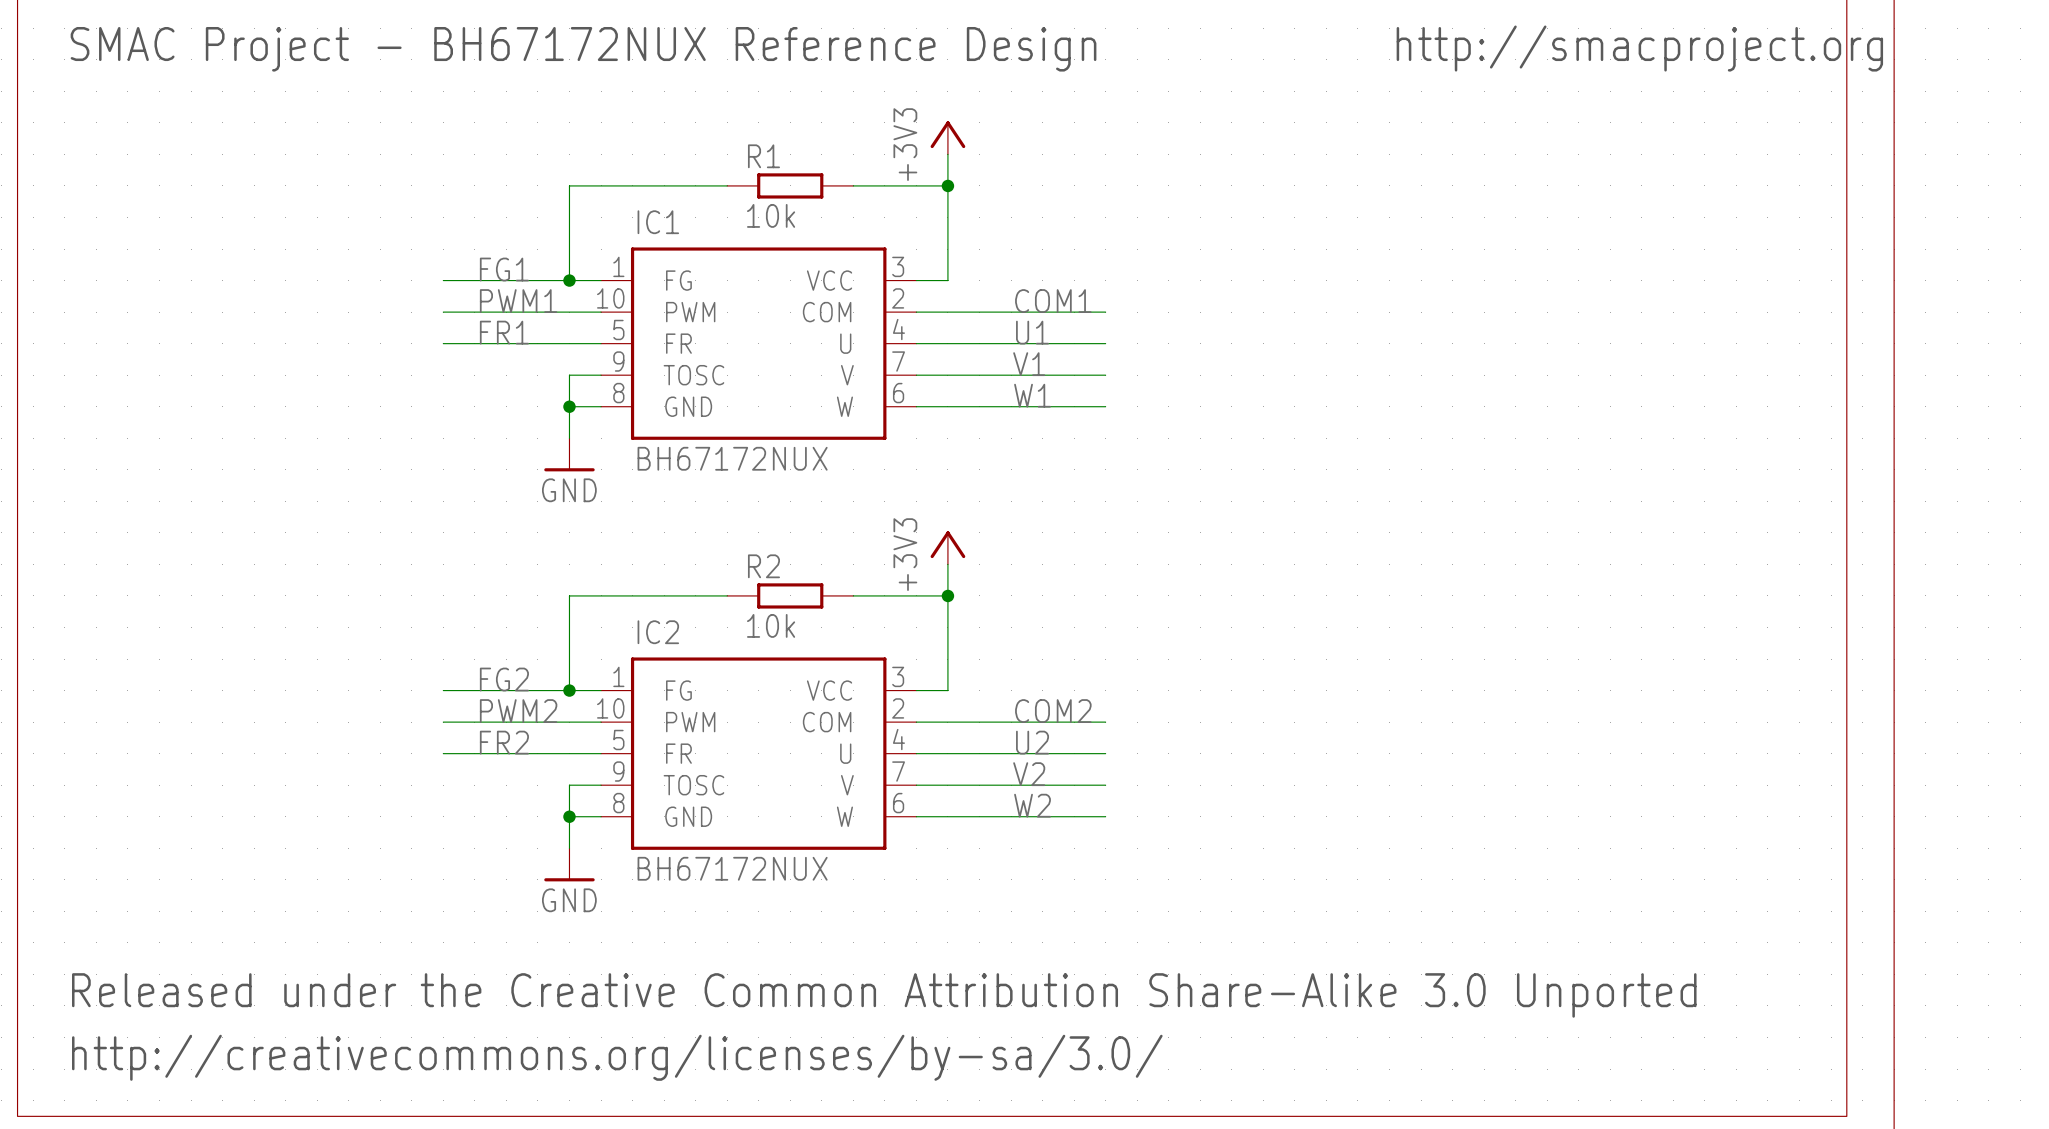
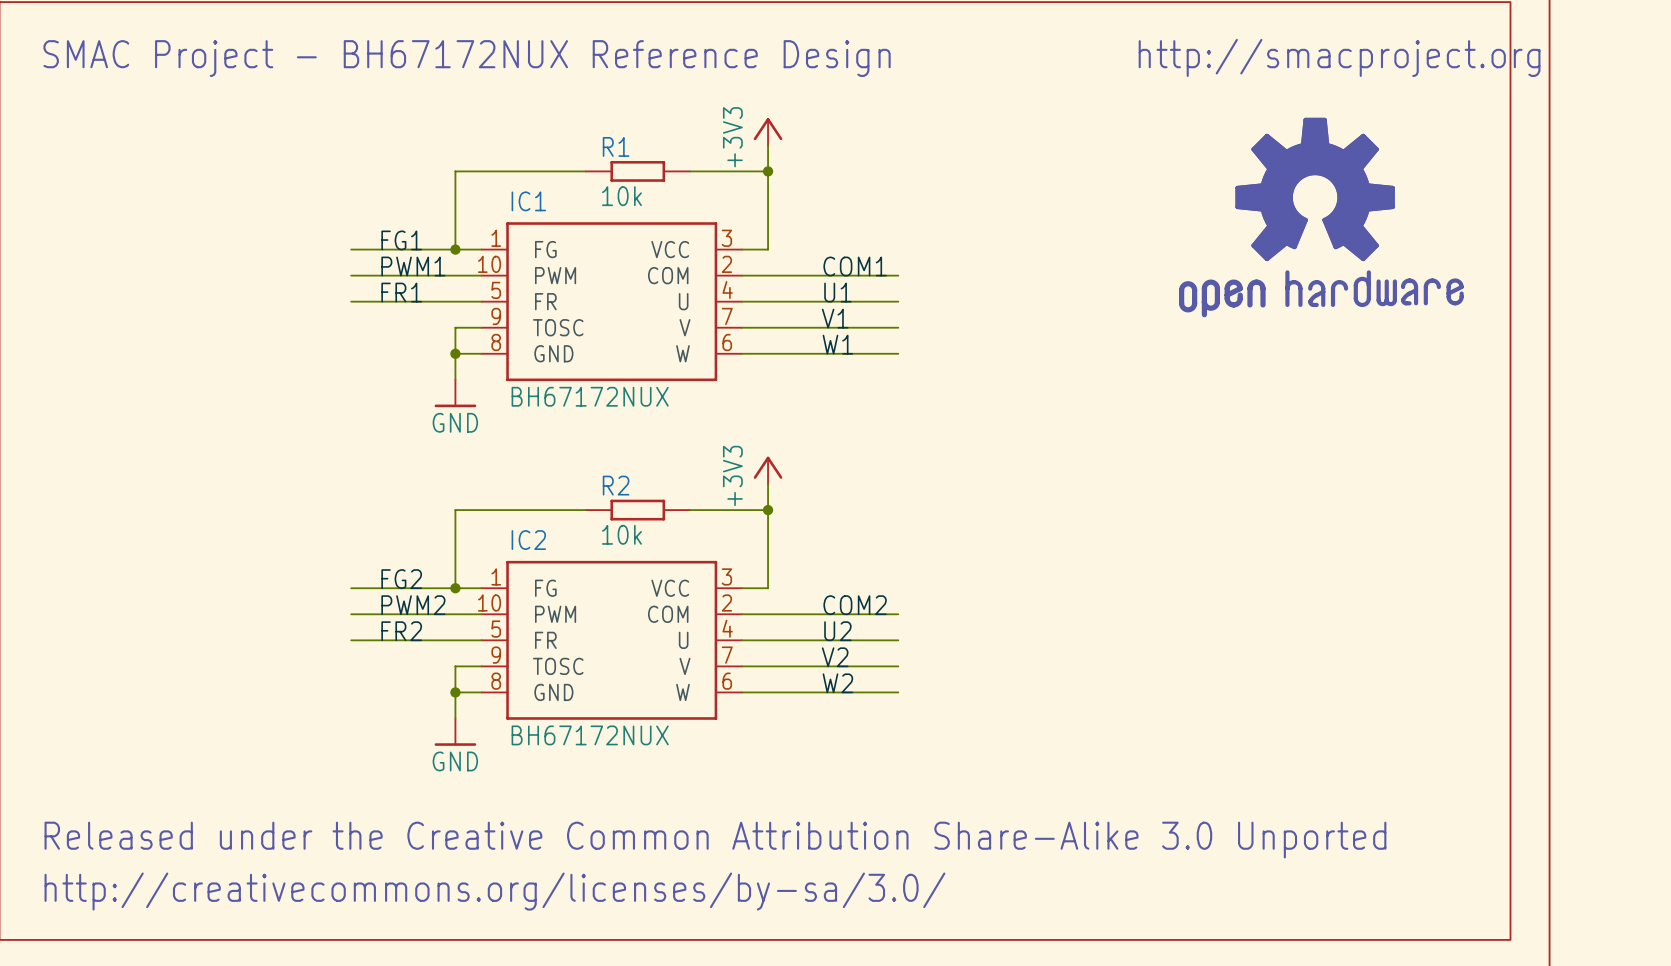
part: none -> (1321, 217)

